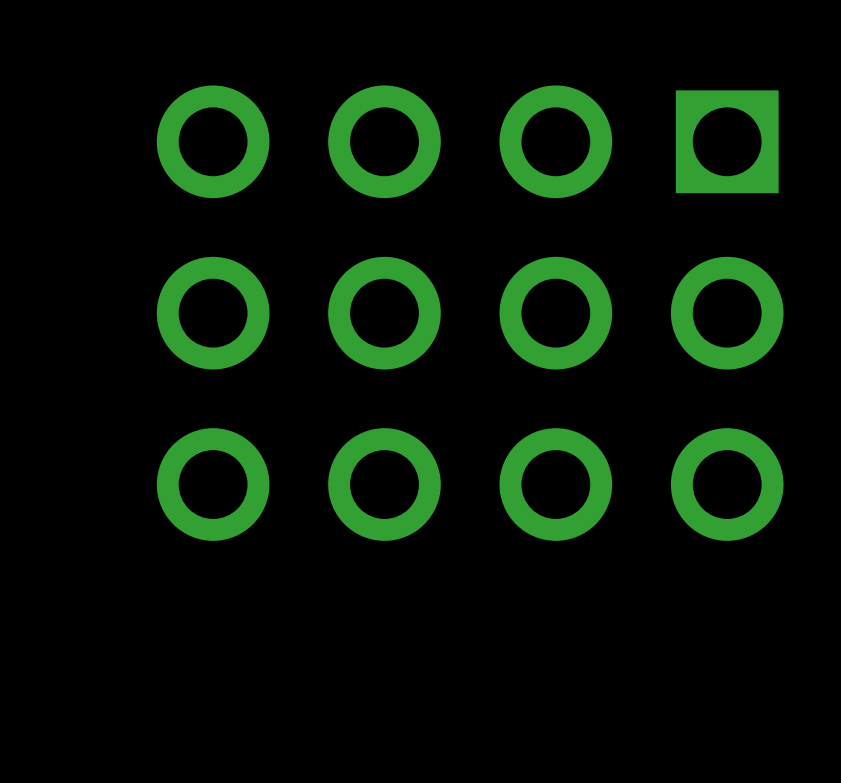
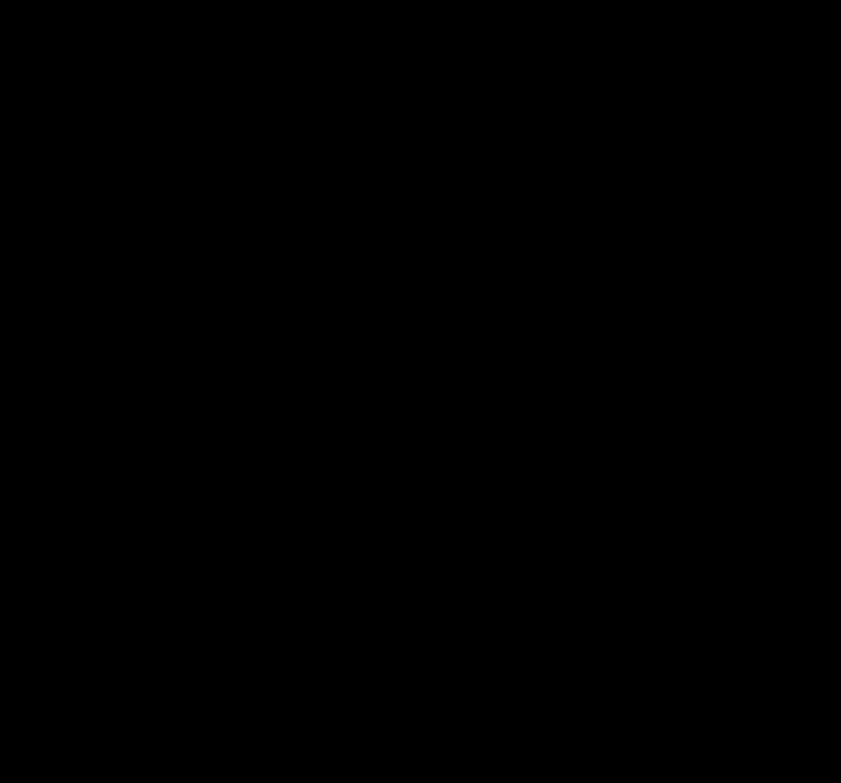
part: (470, 313) -> none

